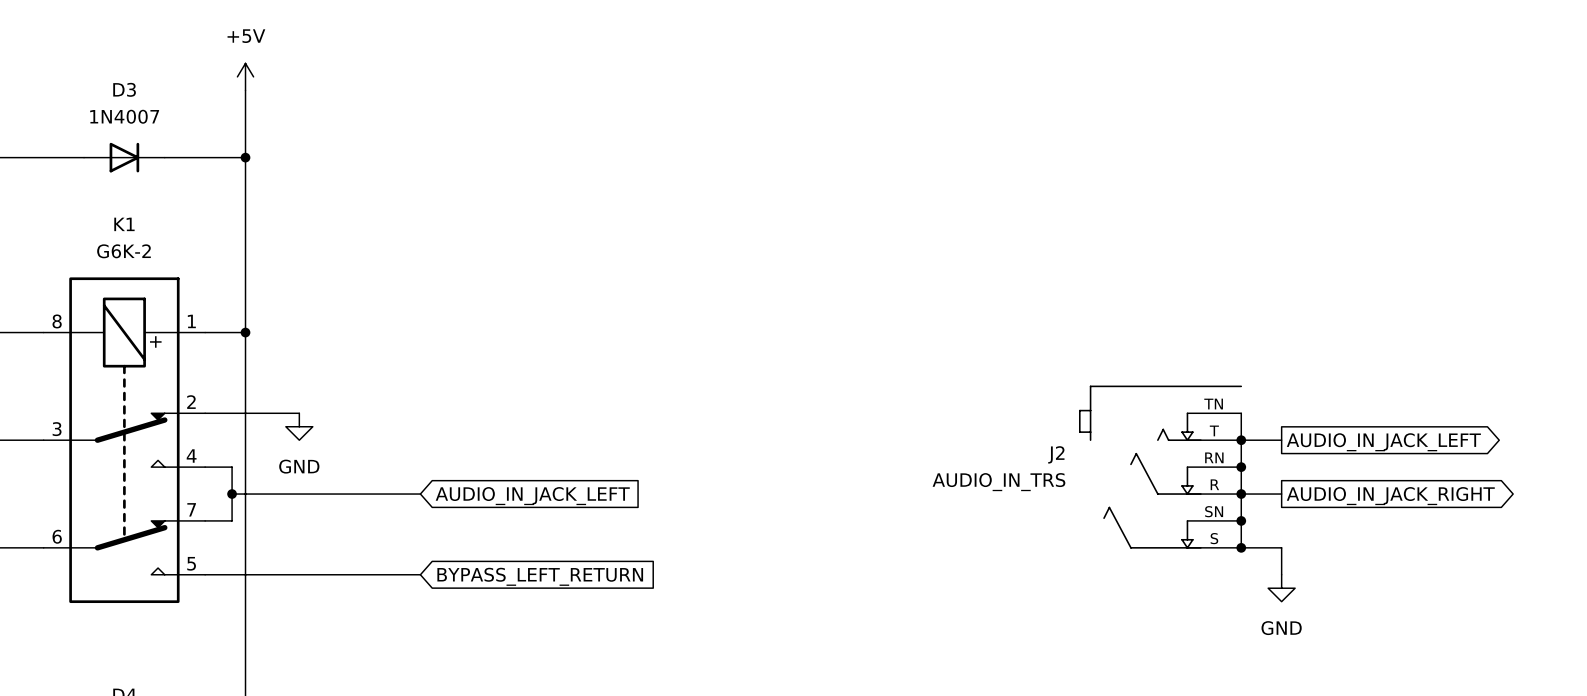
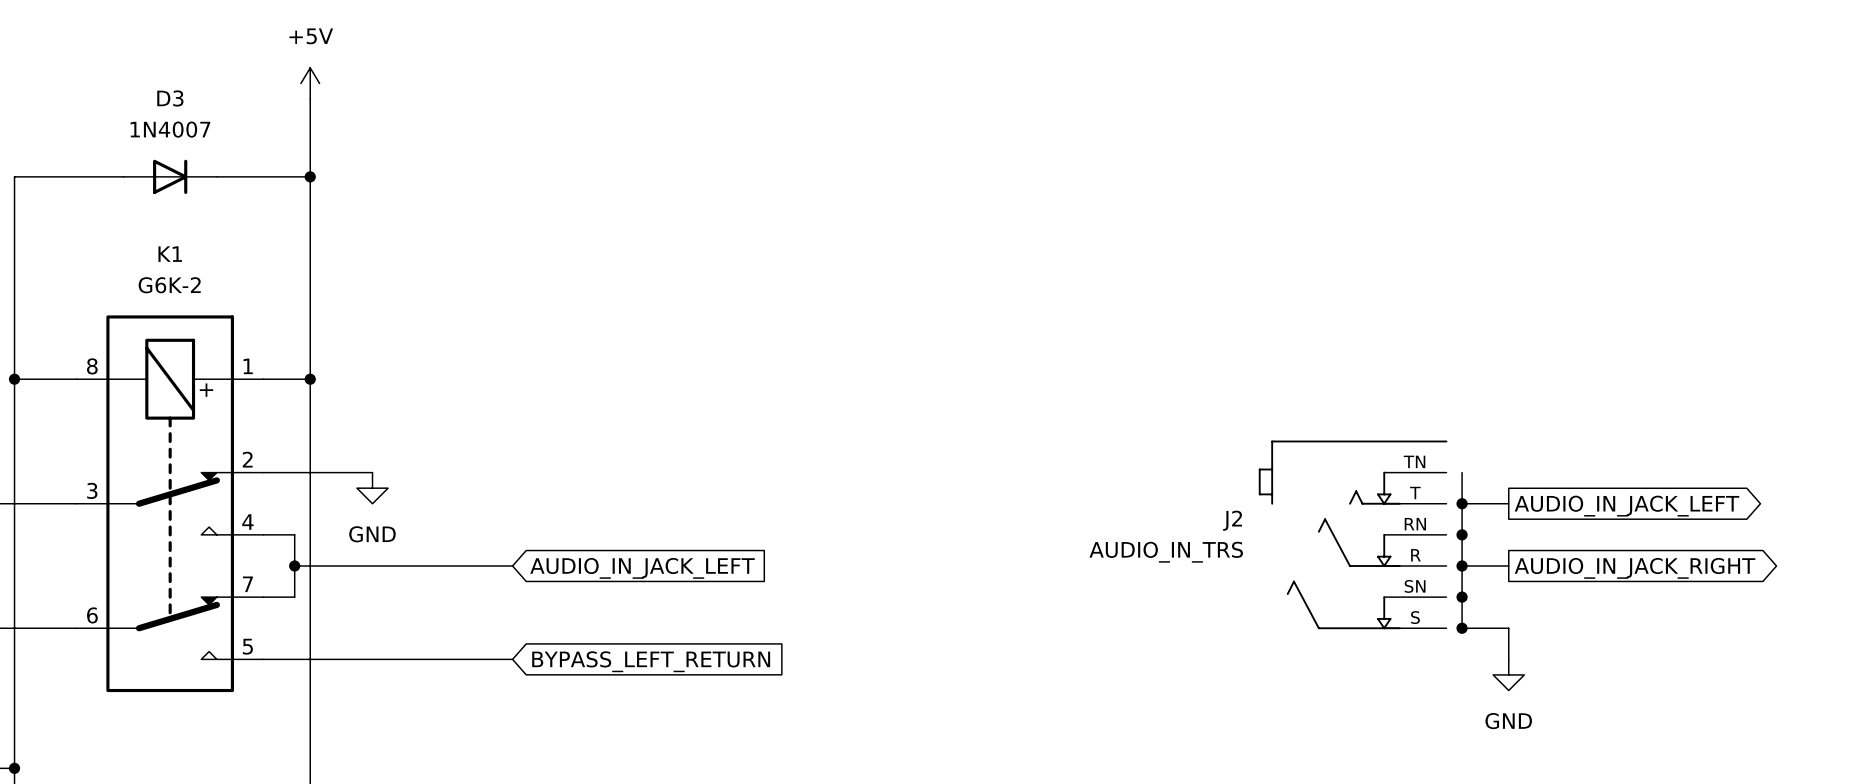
J2 position: (1160, 467) -> (1353, 534)

